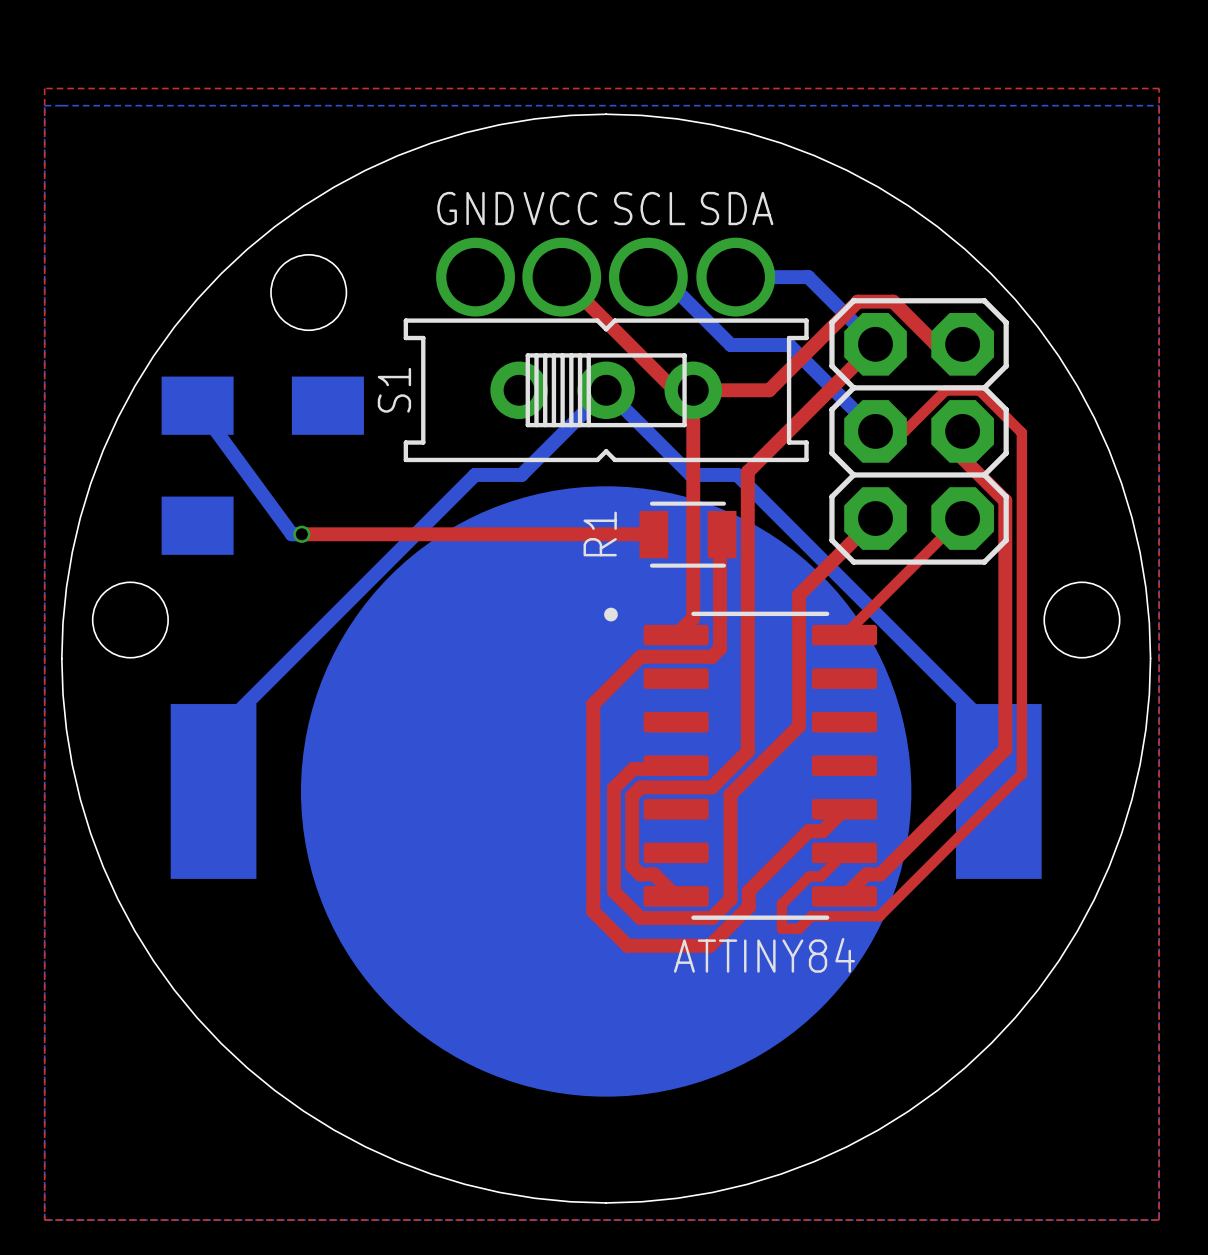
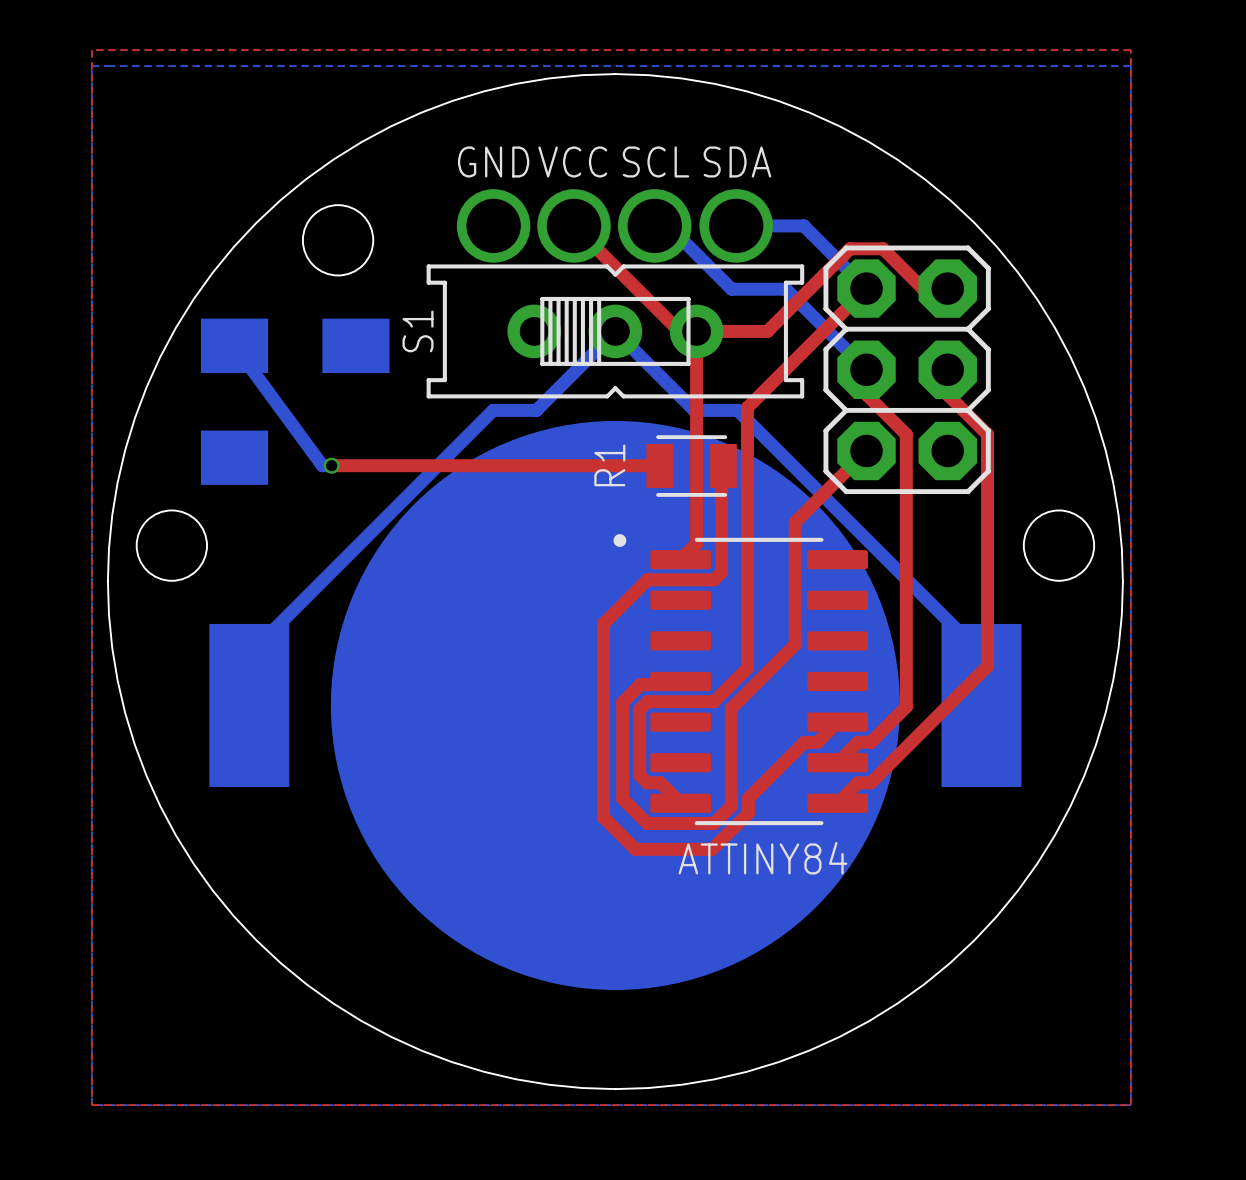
top track: (875, 431) (904, 431) (945, 390) (979, 390) (1021, 432) (1021, 773) (879, 916) (811, 916) (799, 928) (781, 928) (781, 904) (809, 876) (820, 876) (844, 852) -> (866, 369) (866, 394) (906, 434) (906, 706) (870, 742) (858, 742) (837, 762)
top track: (962, 518) (844, 635) -> none

